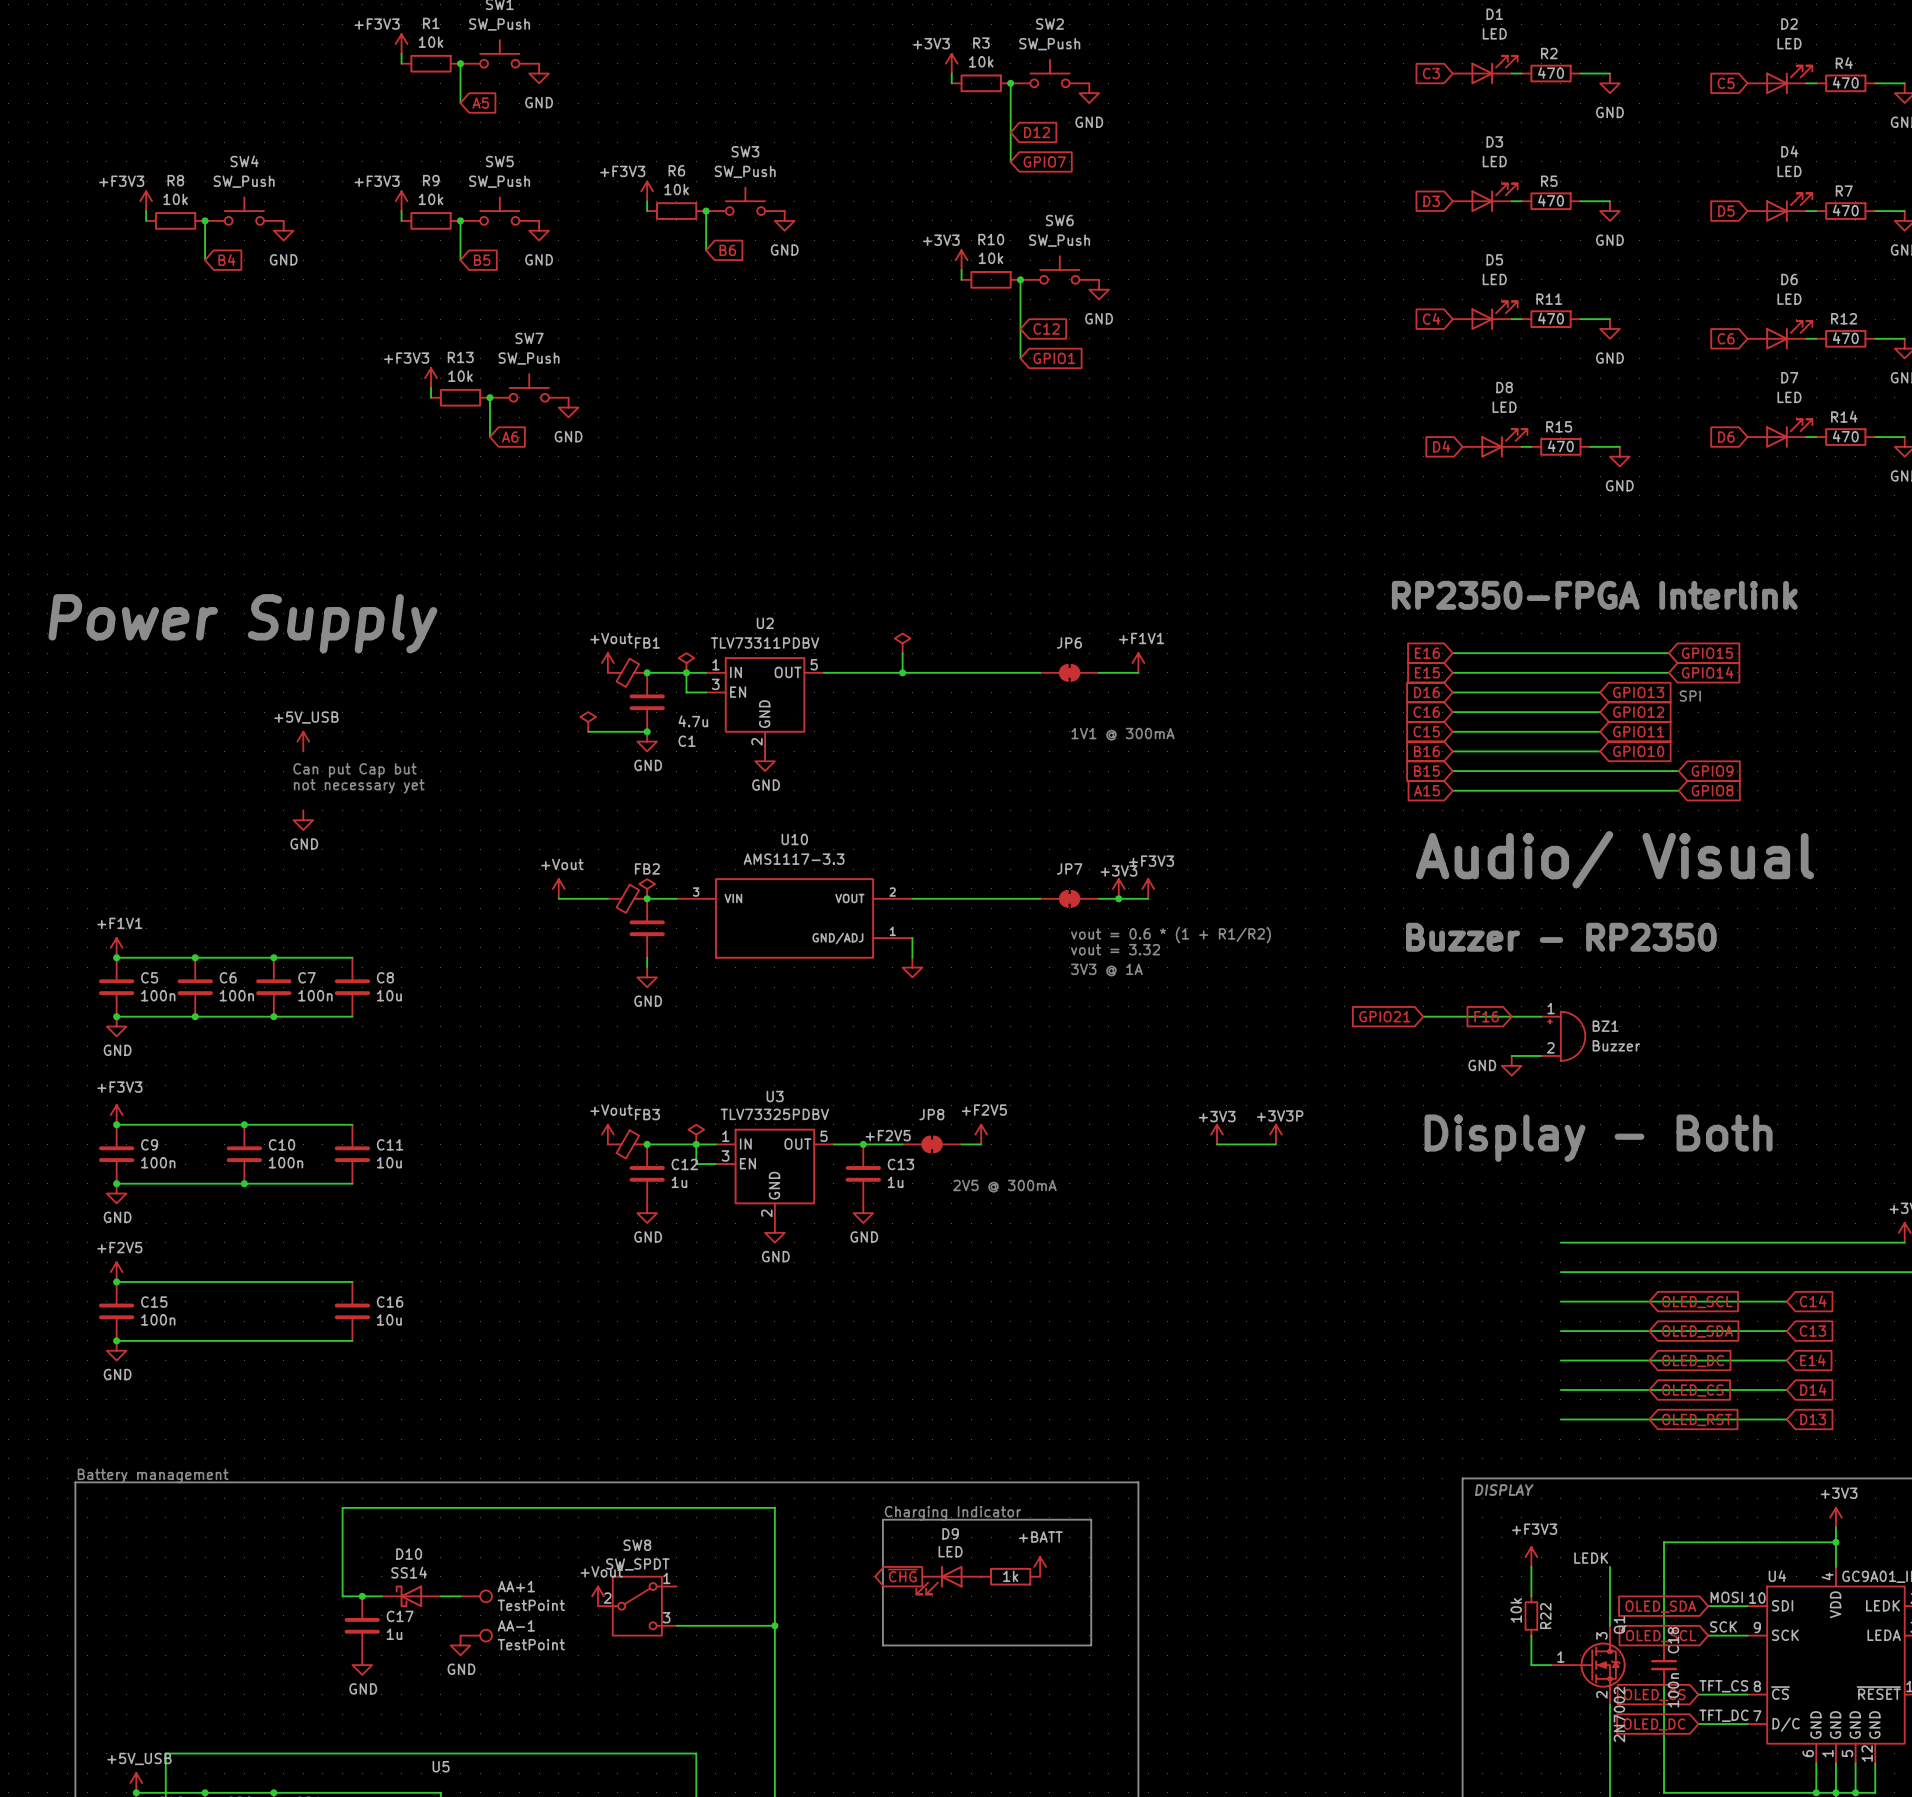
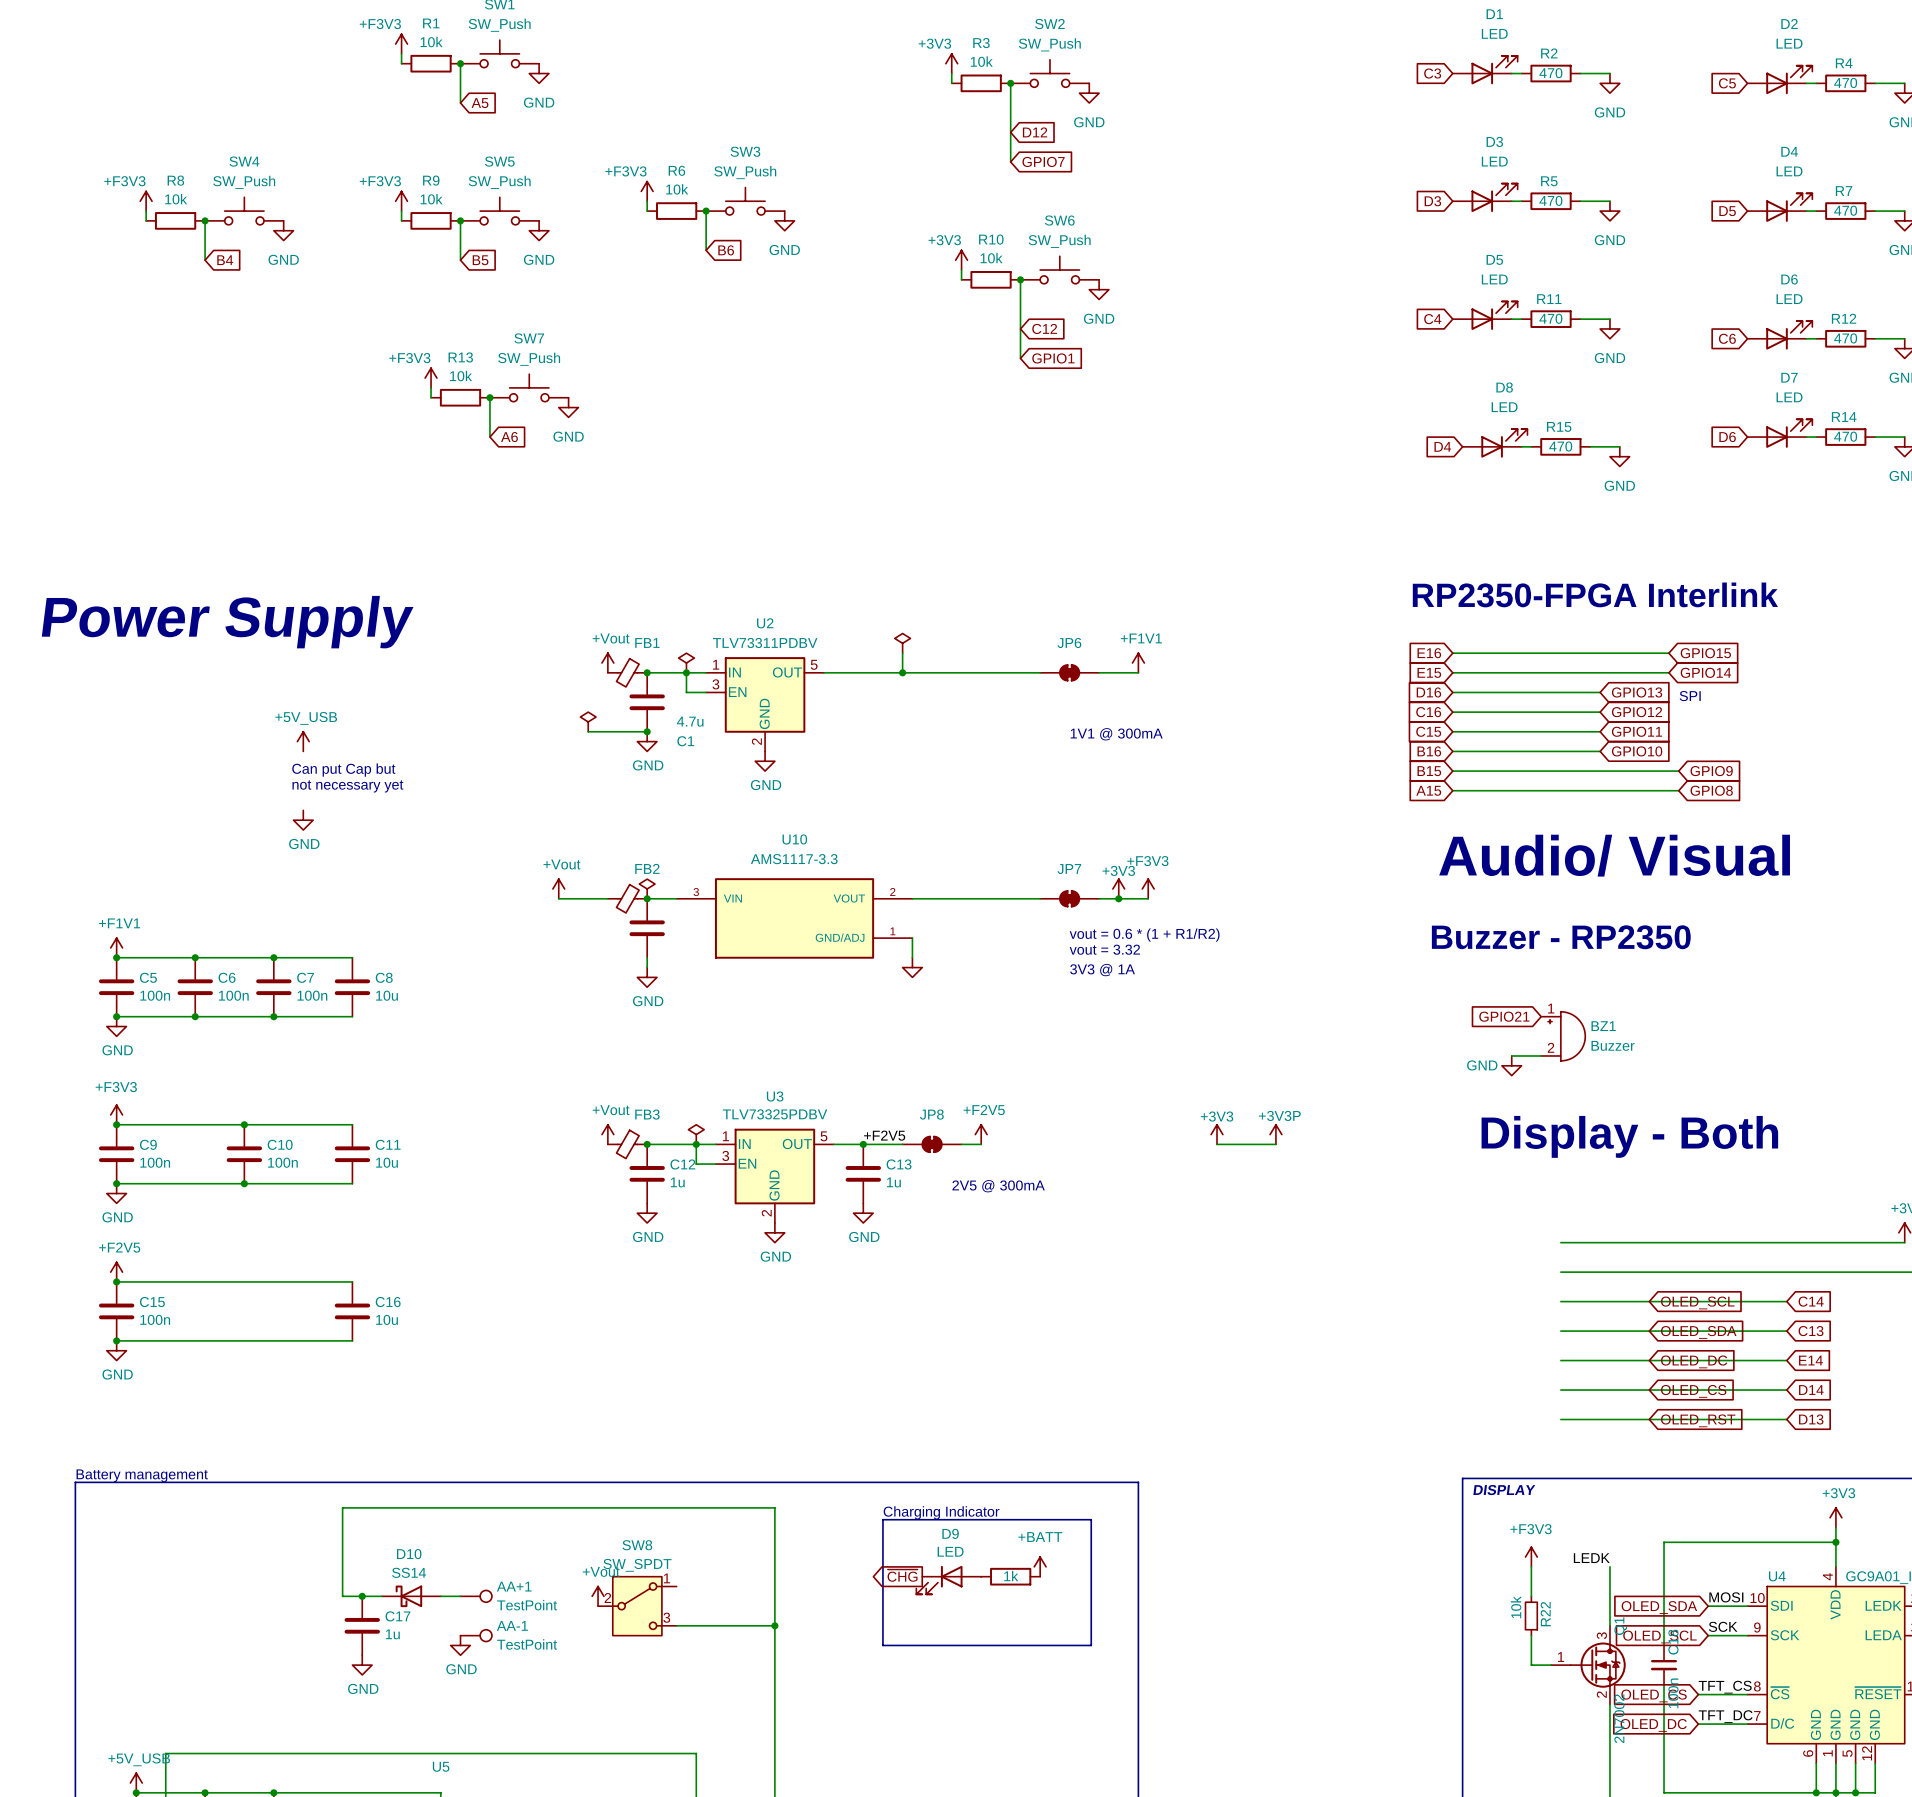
global label position: GPIO21 (1384, 1016) -> GPIO21 (1504, 1016)
wire: (1423, 1016) (1541, 1016) -> none
global label: F16 (1486, 1016) -> none

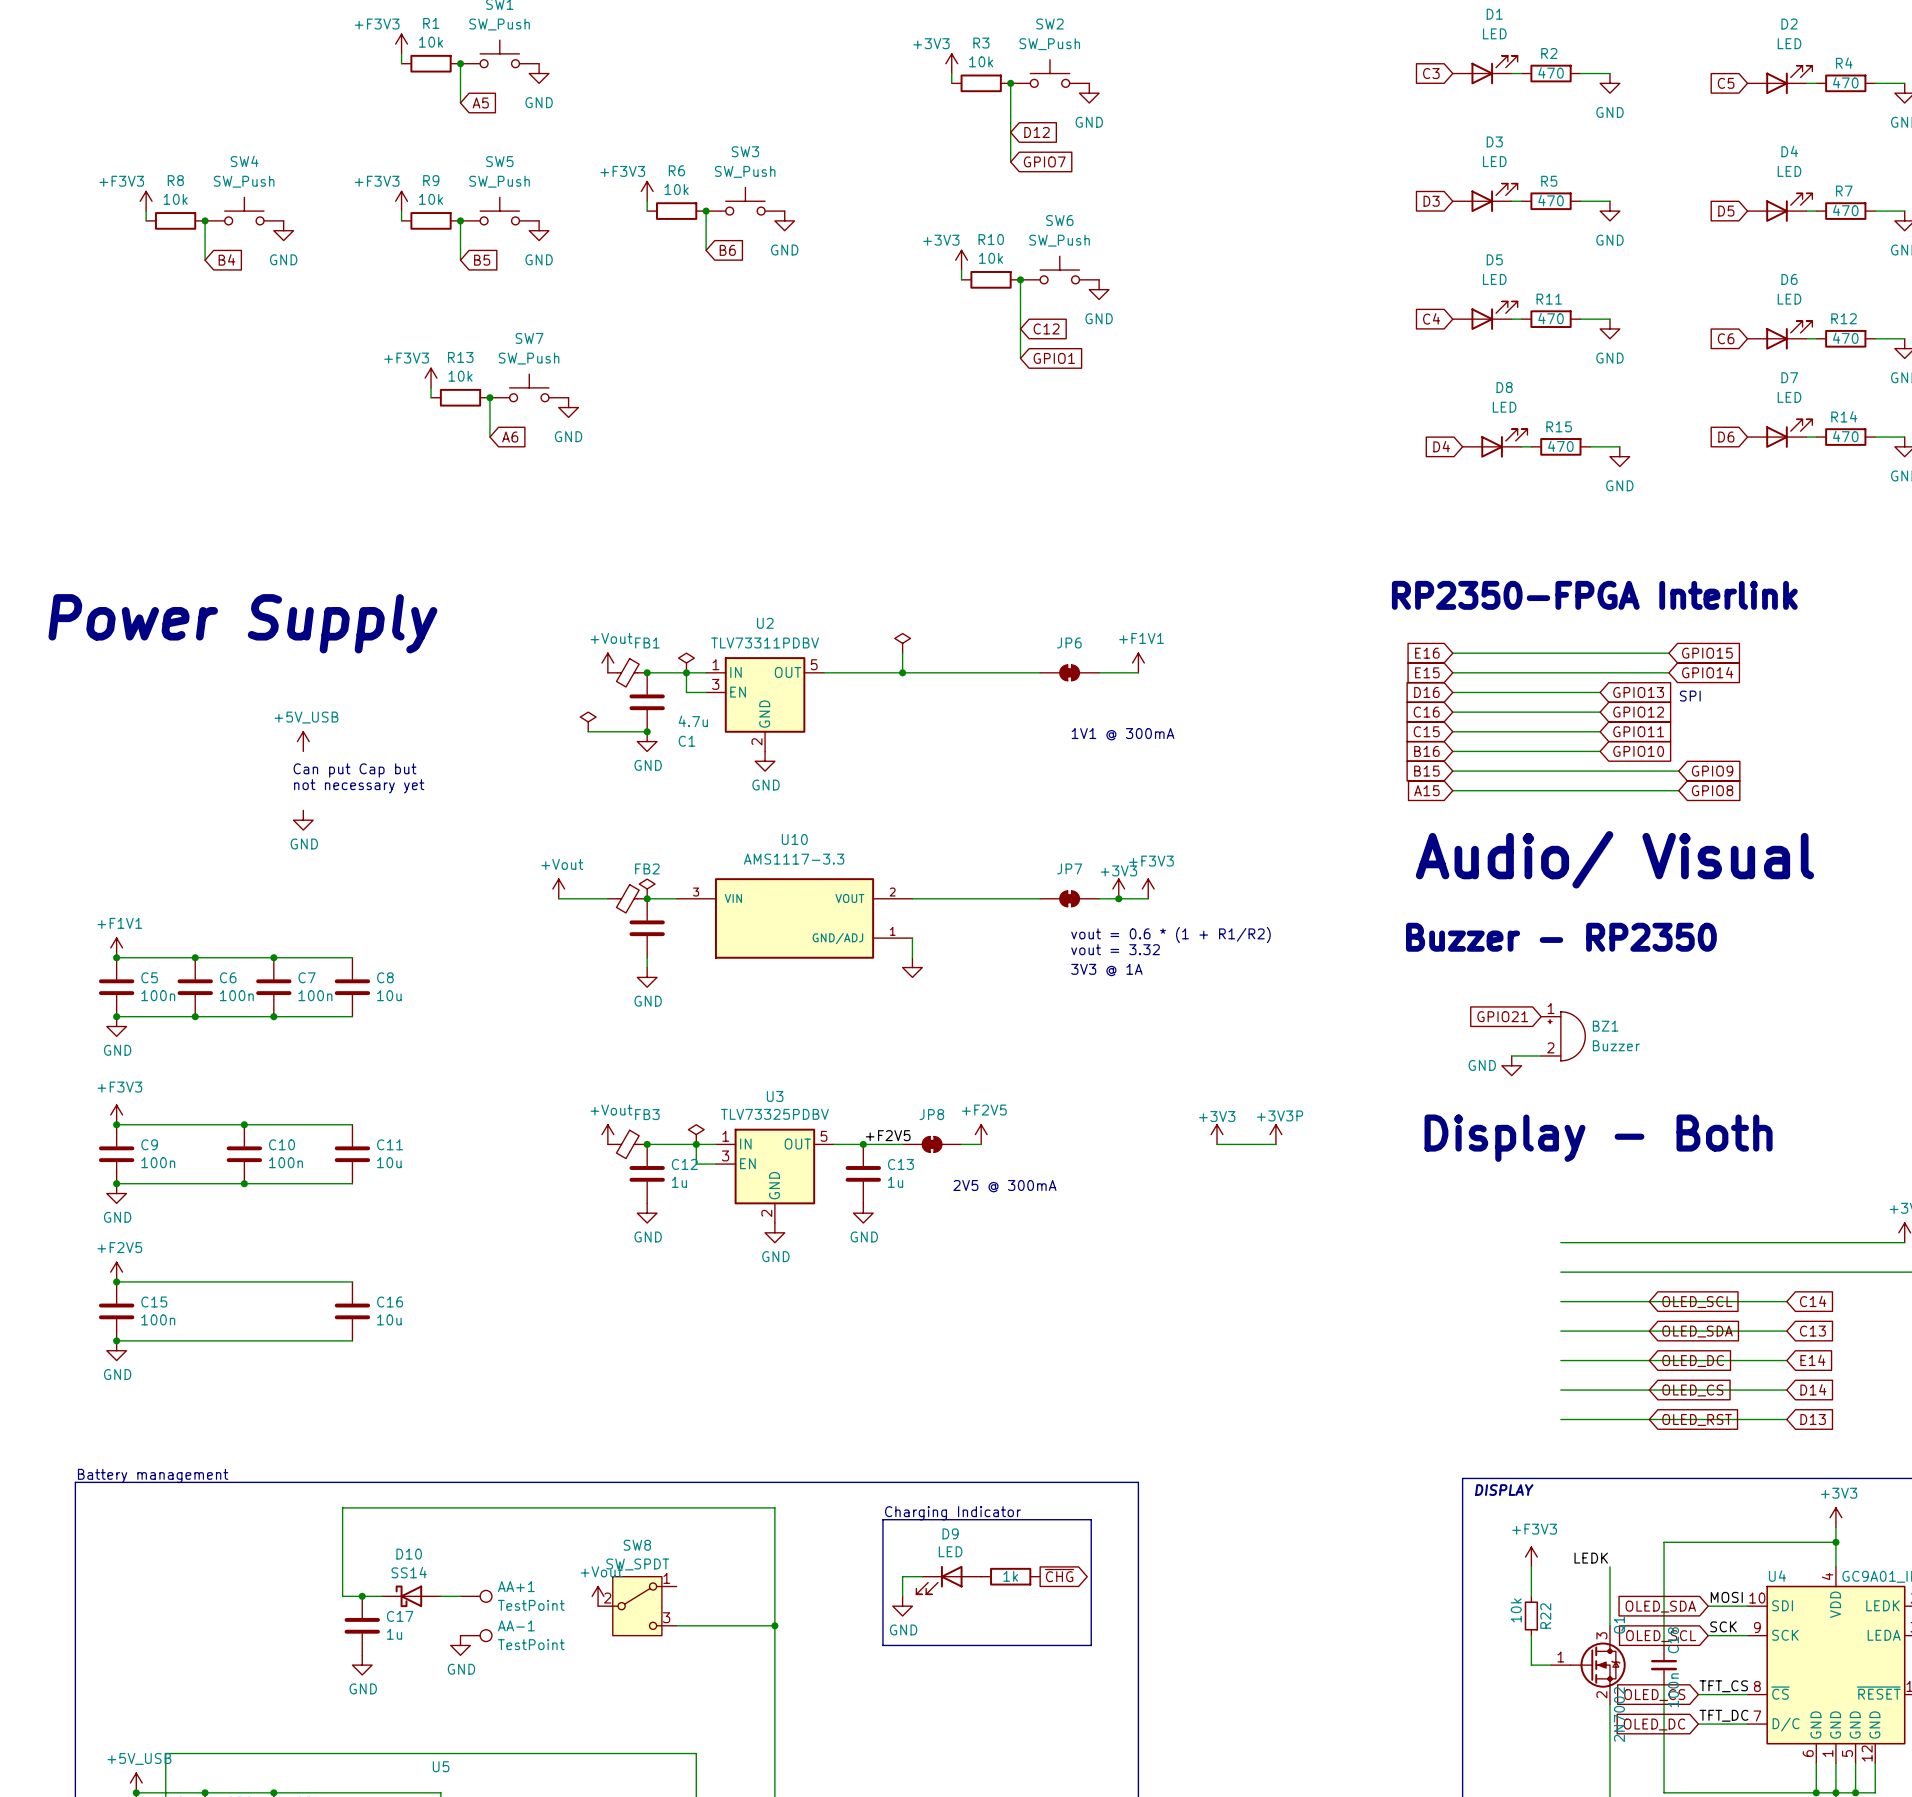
power symbol: +BATT (1040, 1566) -> none
global label rotation: 0° (902, 1575) -> 180° (1059, 1575)
global label position: ~{CHG} (902, 1575) -> ~{CHG} (1059, 1575)
wire: none -> (922, 1576) (902, 1576) (902, 1596)
power symbol: none -> GND (902, 1606)

